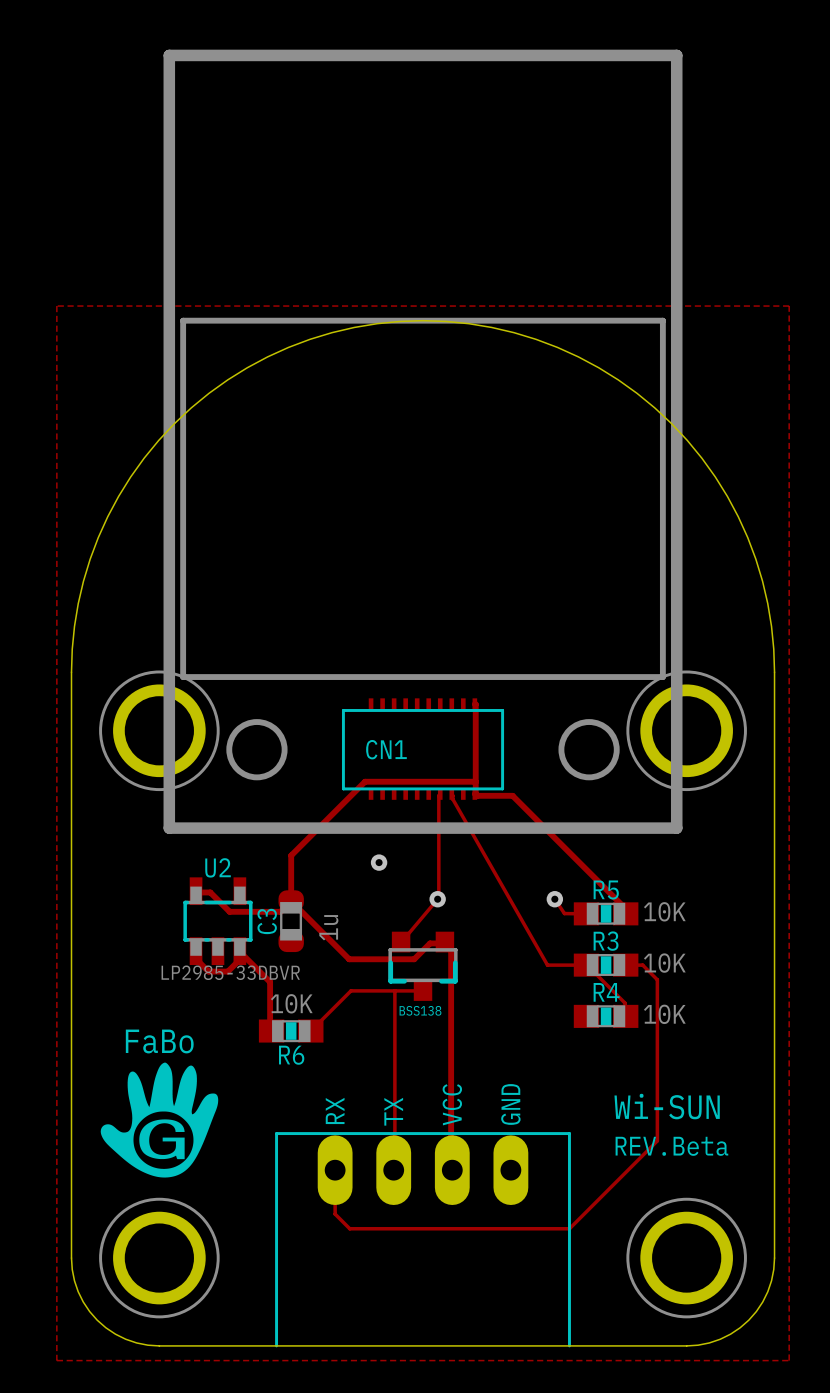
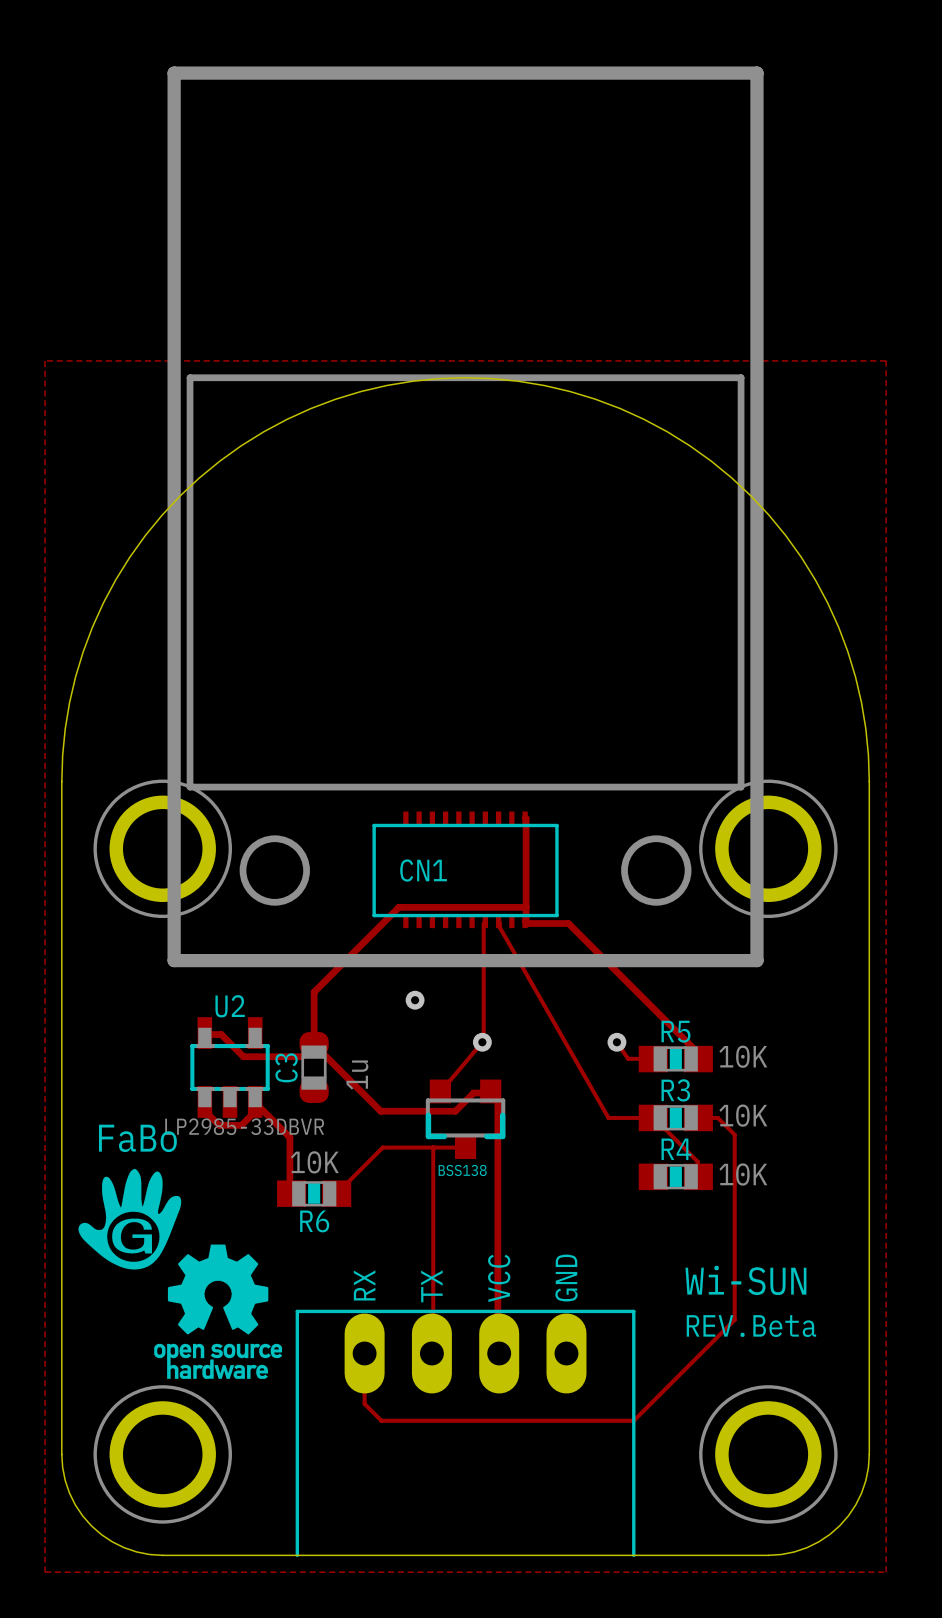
drawing: none -> [78, 1168, 283, 1379]
text position: FaBo (159, 1041) -> FaBo (137, 1138)
drawing: [100, 1062, 219, 1178] -> none

